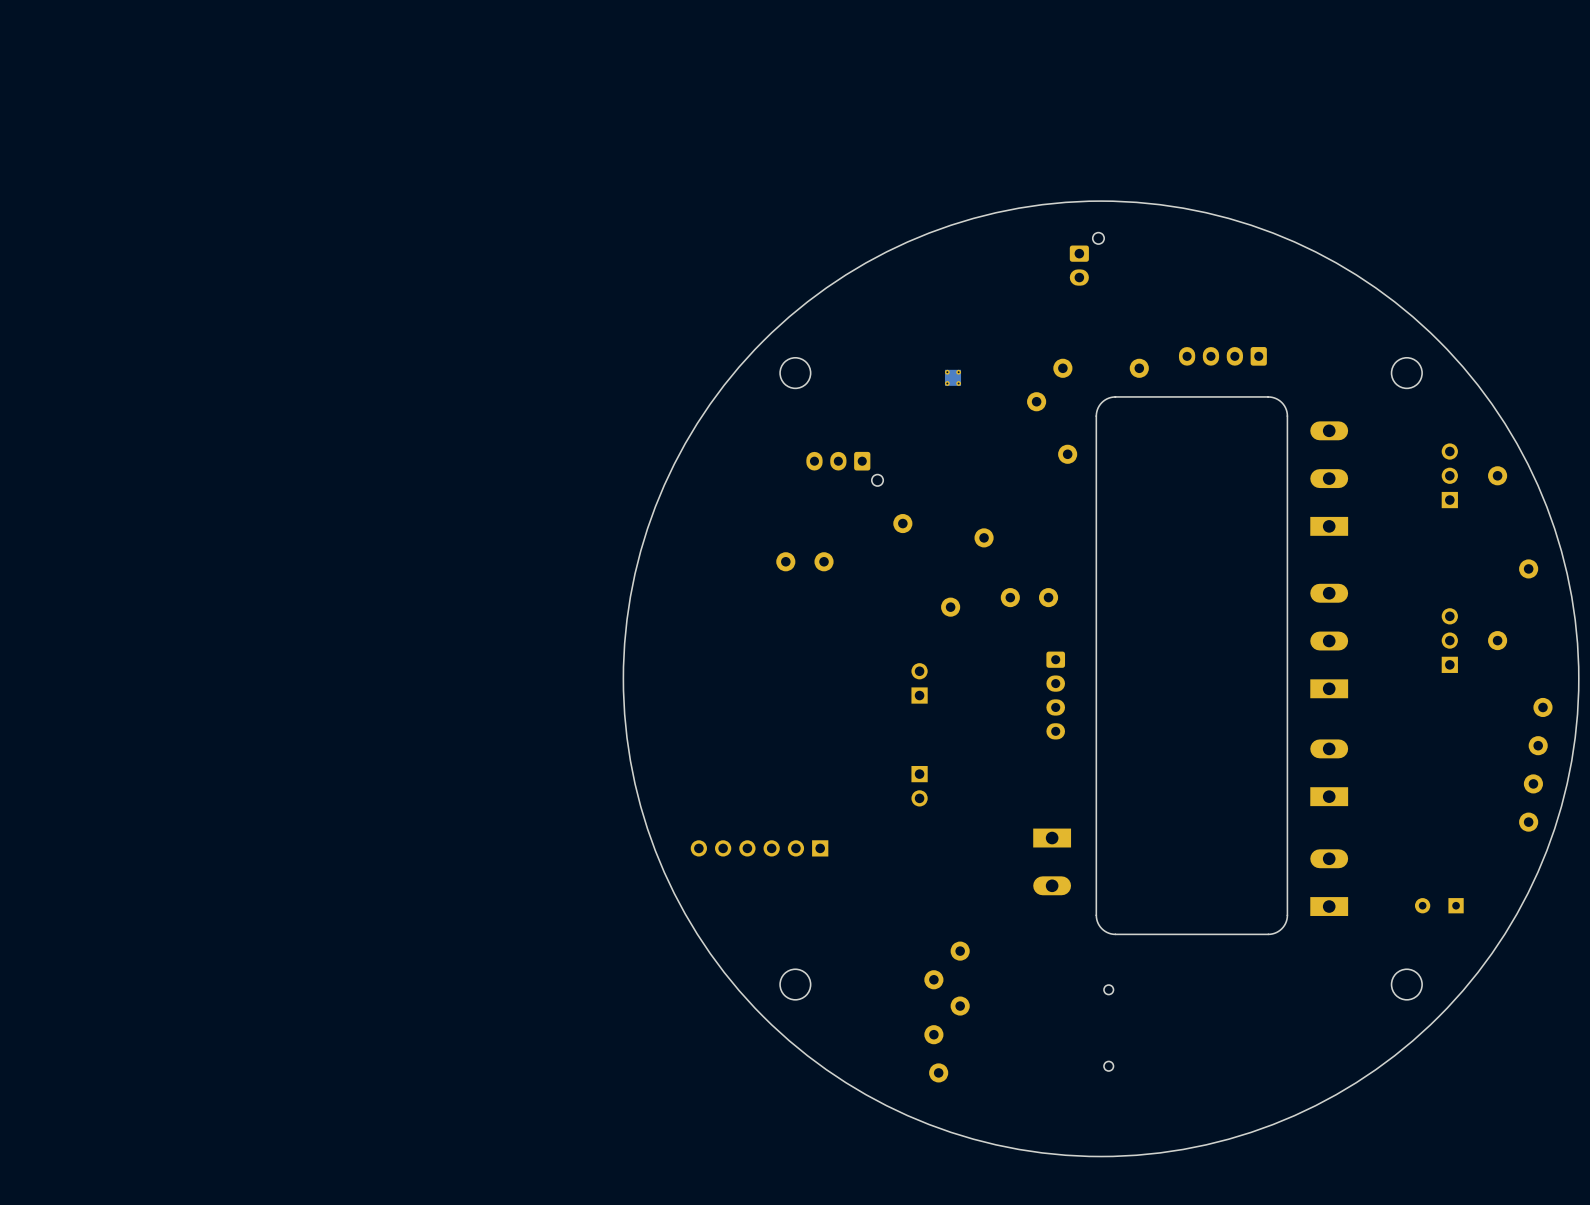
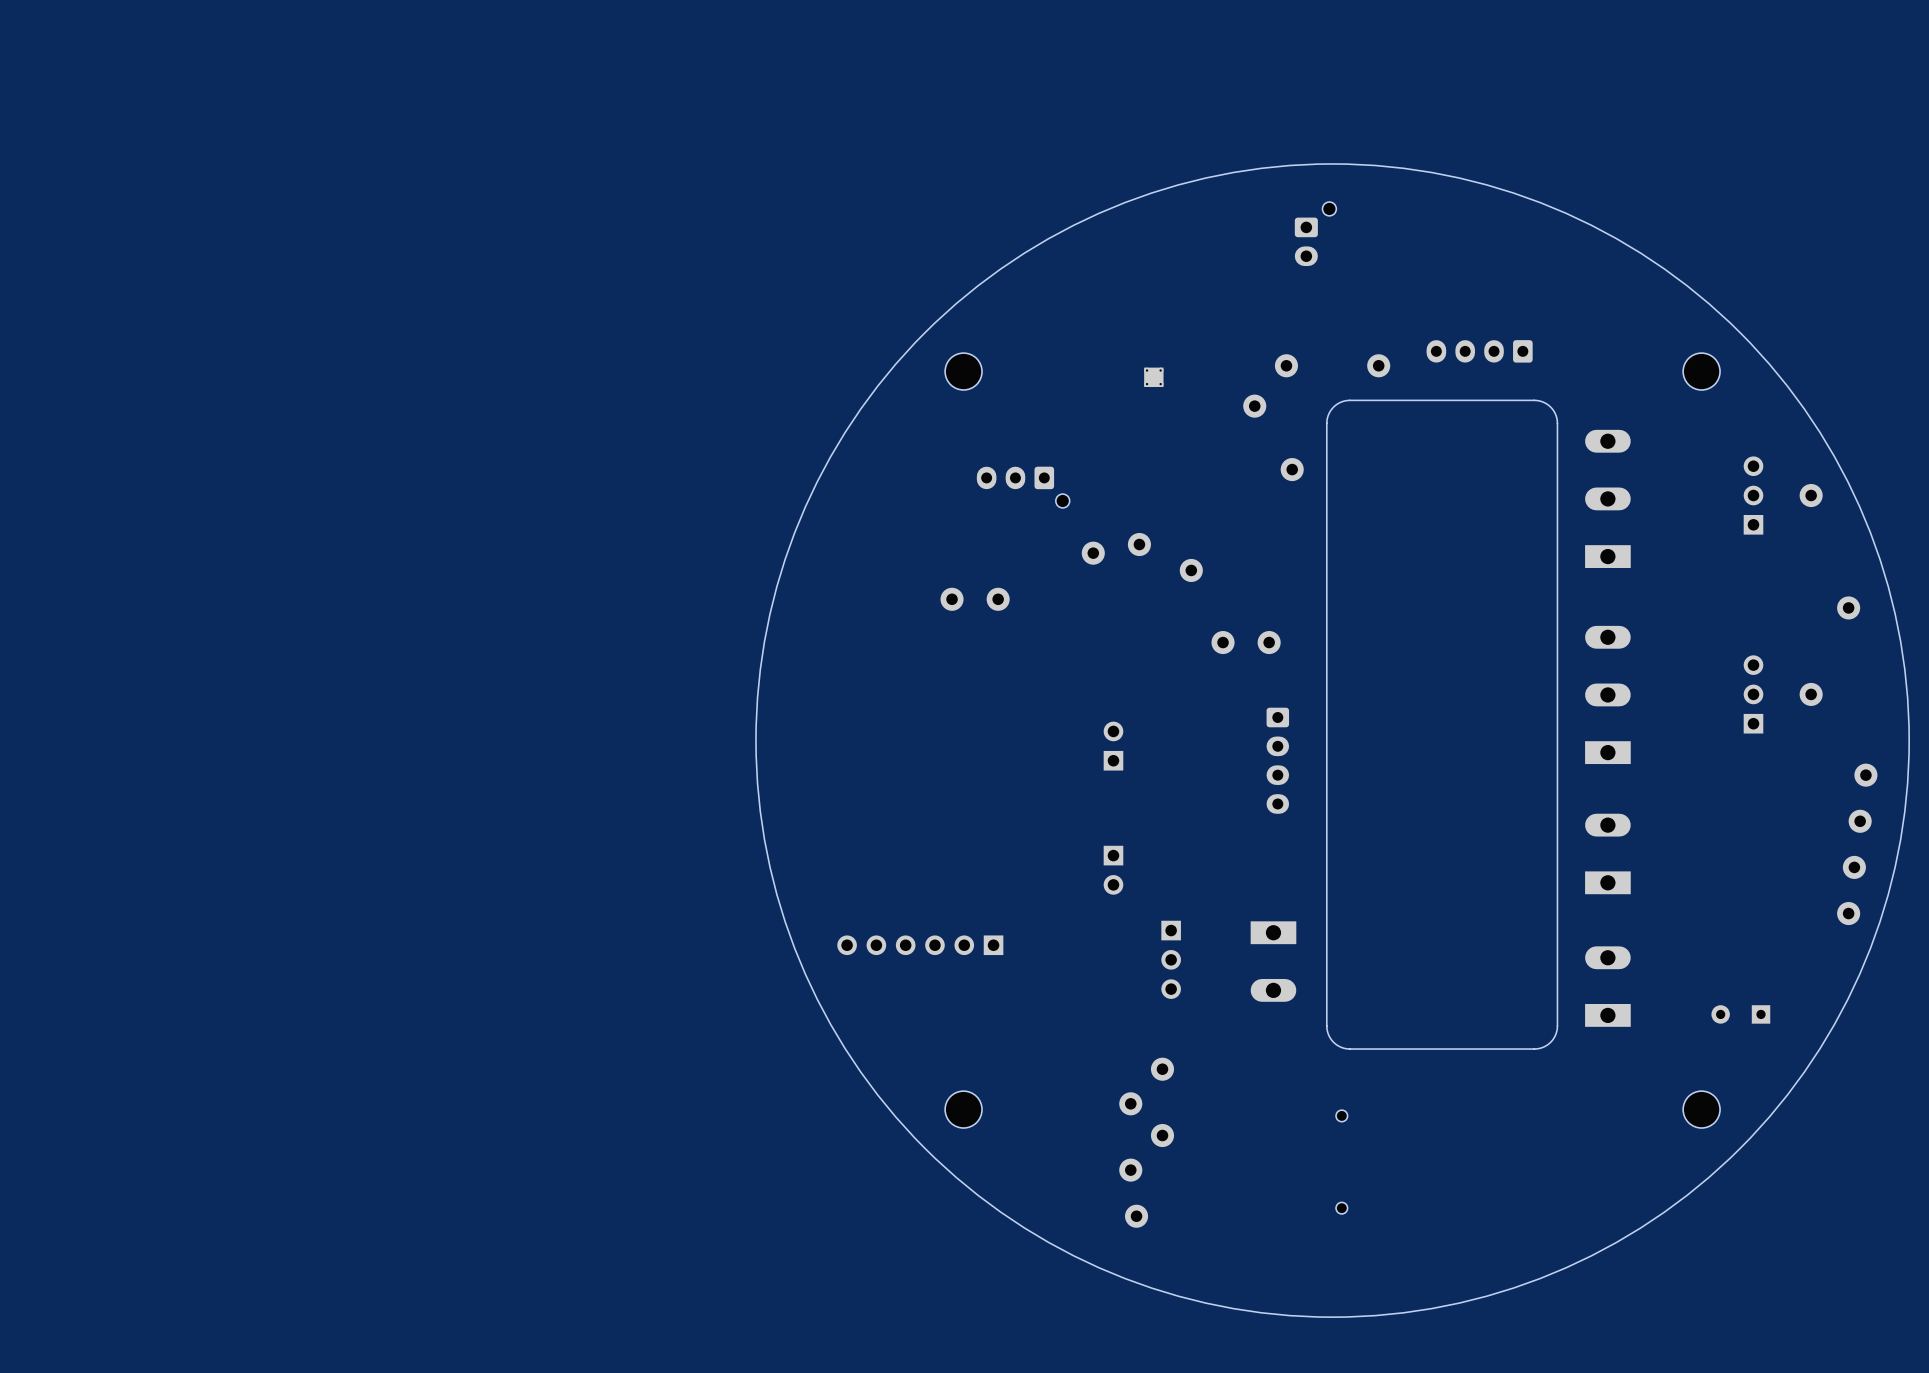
part position: (950, 607) -> (1139, 544)
part: none -> (1171, 959)

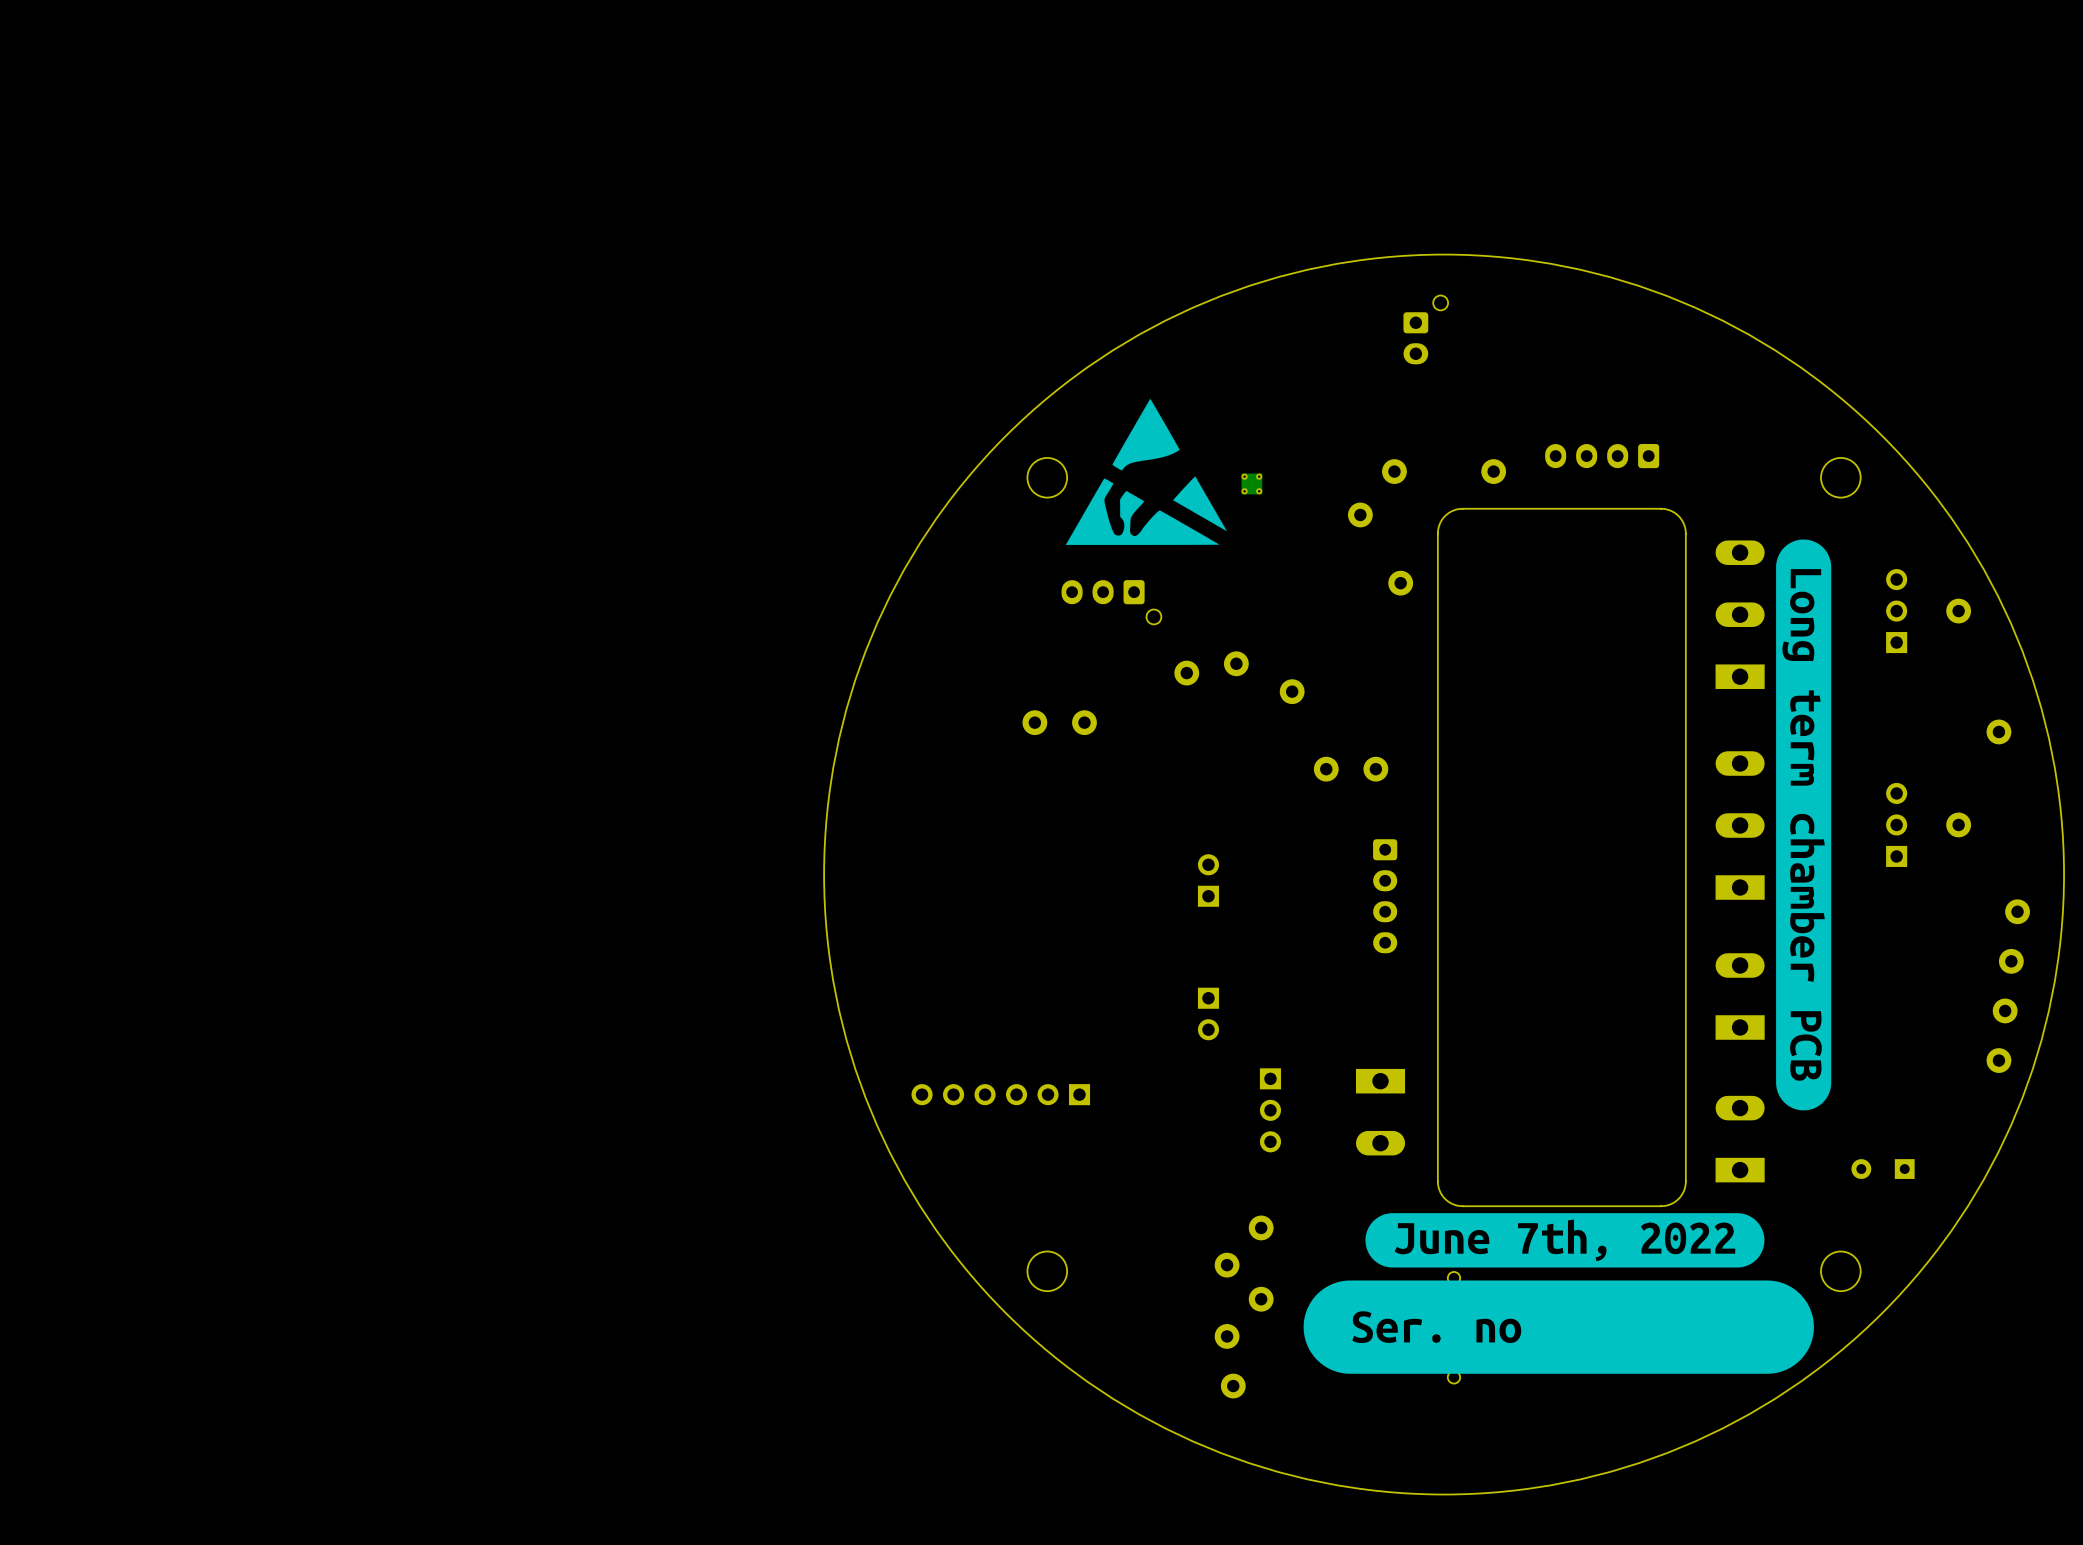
drawing: none -> [1065, 398, 1227, 545]
drawing: none -> [1776, 539, 1832, 1111]
drawing: none -> [1303, 1213, 1814, 1374]

